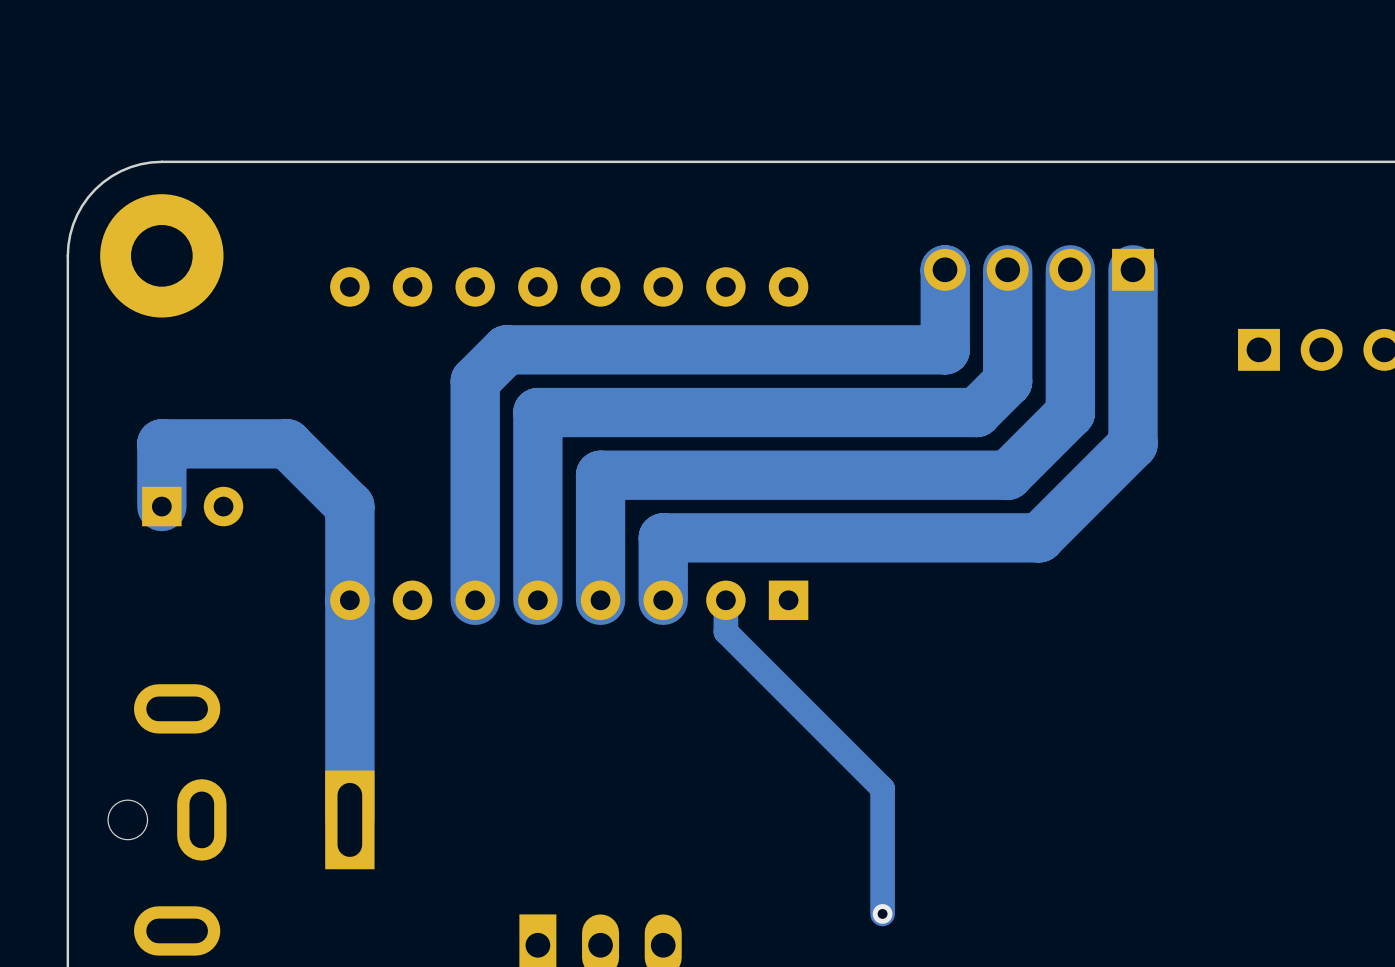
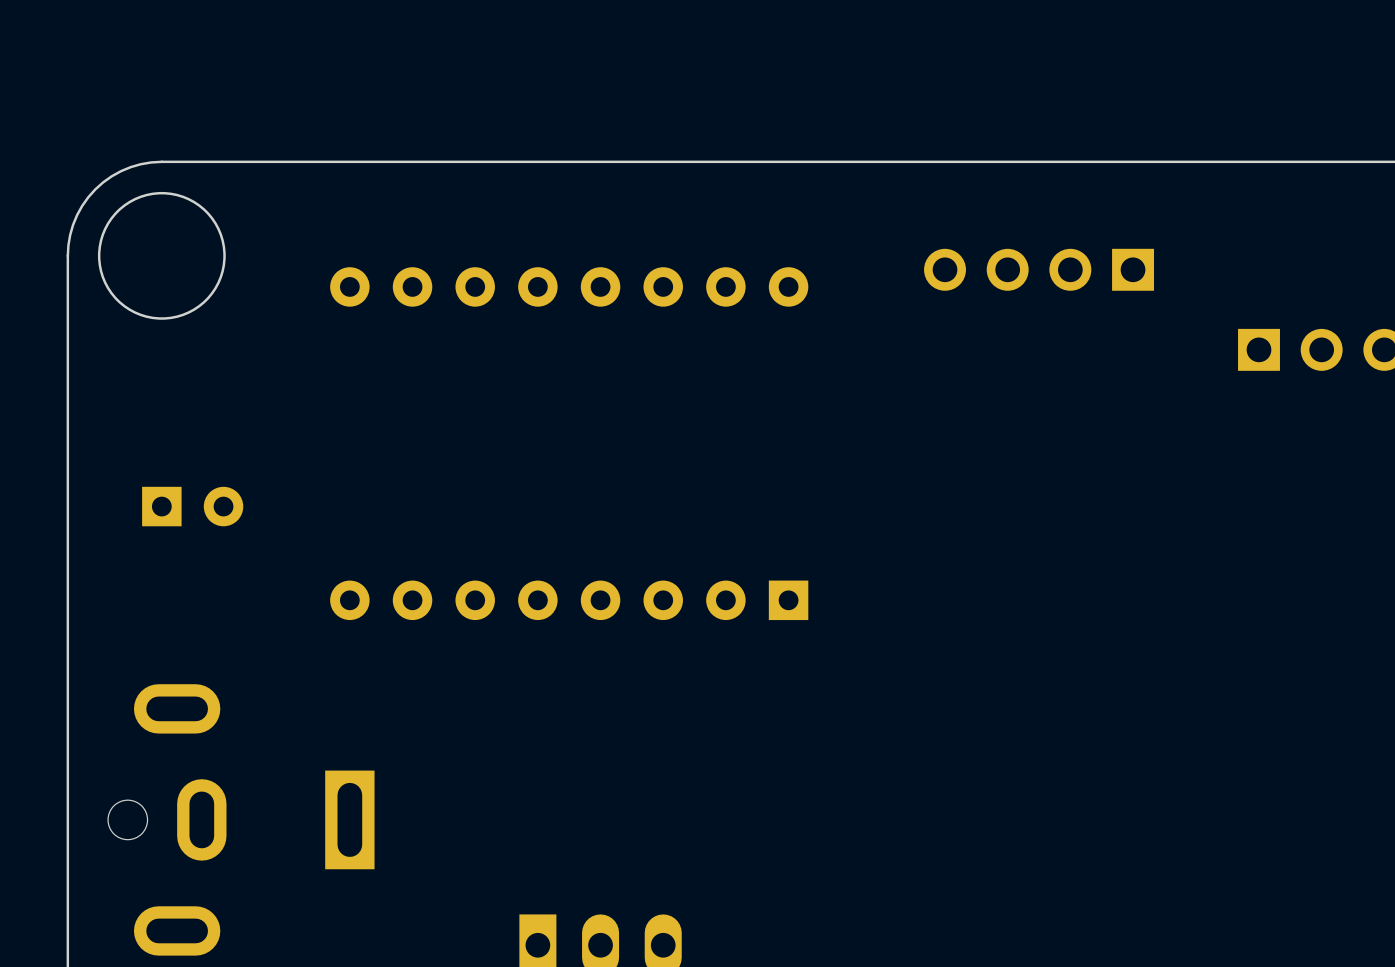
round board edge: none -> [97, 191, 226, 320]
part: (161, 255) -> none
track: (1007, 269) (1007, 381) (976, 412) (537, 412) (537, 600) -> none
track: (1070, 269) (1070, 412) (1007, 475) (600, 475) (600, 600) -> none
track: (1133, 269) (1133, 444) (1039, 537) (663, 537) (663, 600) -> none
track: (945, 270) (945, 349) (506, 349) (475, 381) (475, 600) -> none
track: (161, 506) (161, 443) (287, 443) (349, 506) (349, 819) -> none
track: (725, 600) (725, 631) (882, 788) (882, 913) -> none
via: (882, 913) -> none

